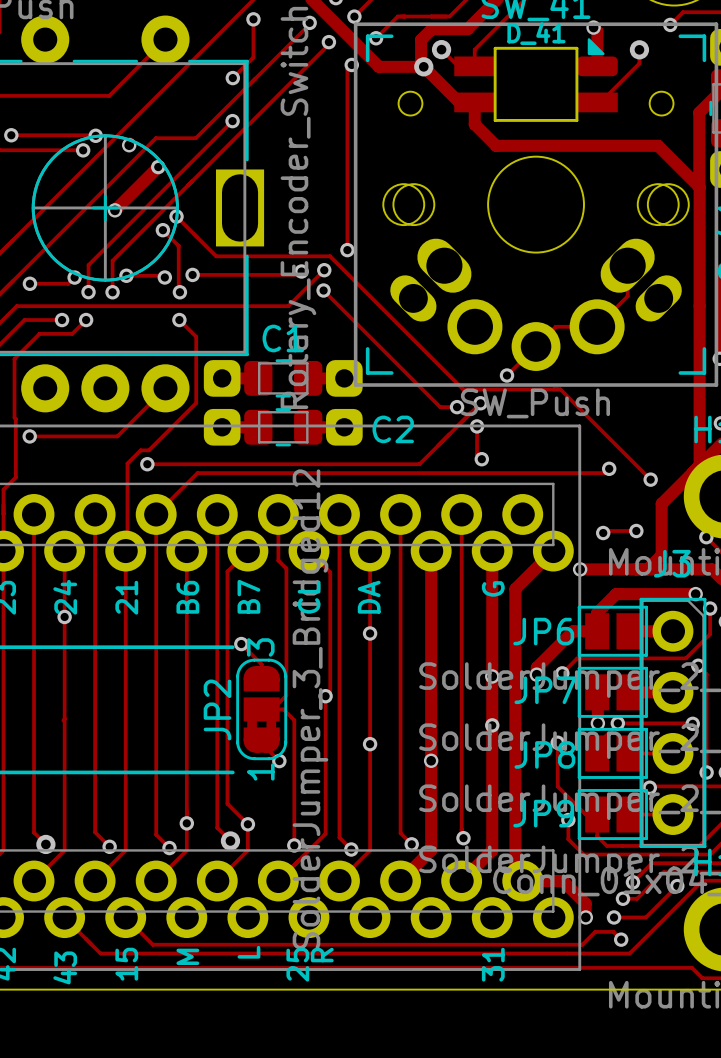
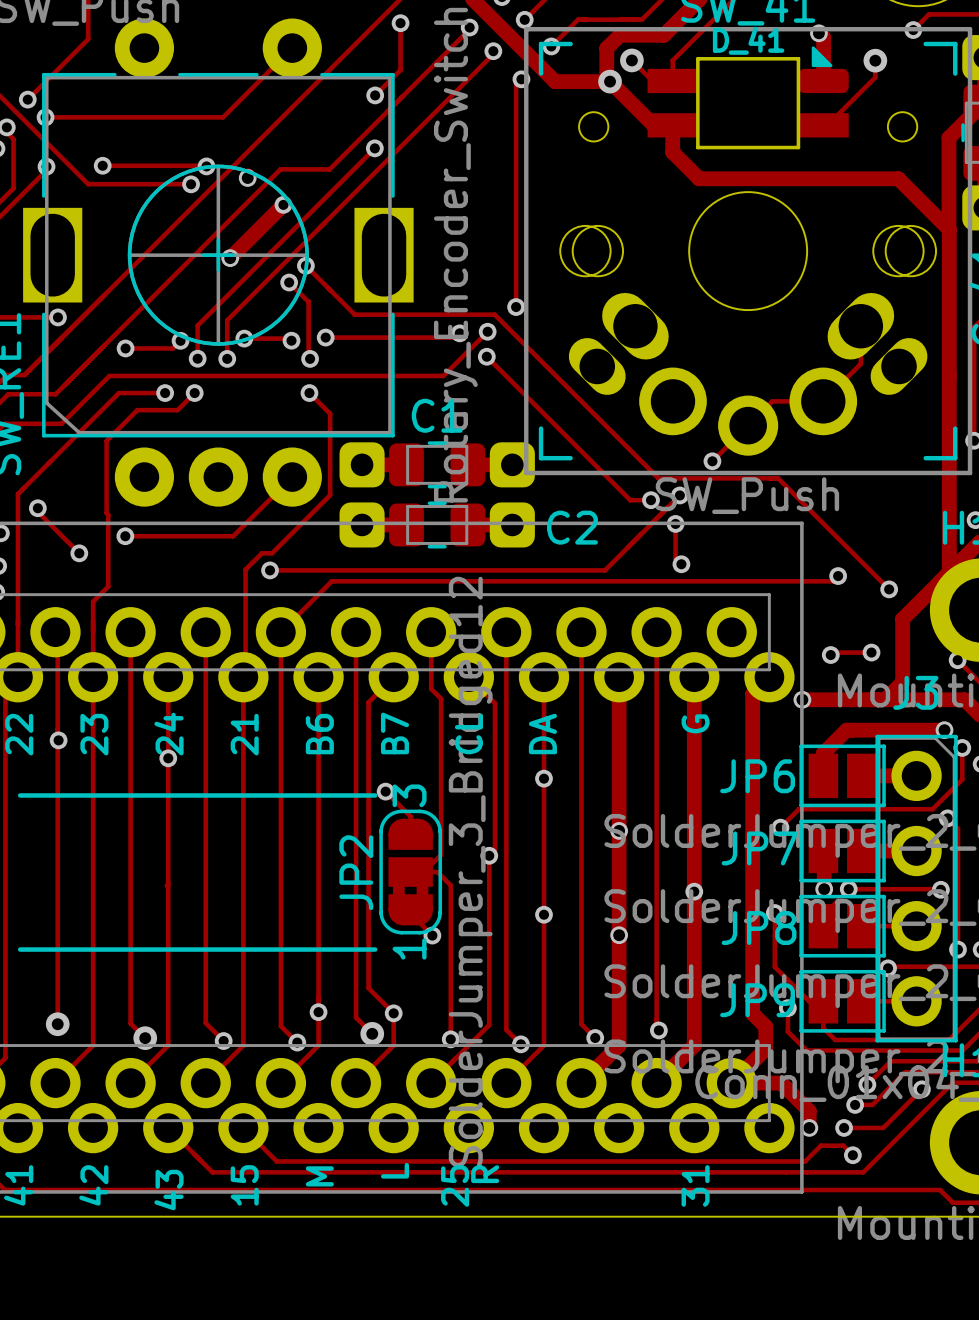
track: (539, 564) (515, 588) (515, 873) (522, 881) -> (752, 694) (752, 1013) (765, 1026) (765, 1049) (731, 1083)
track: (597, 631) (573, 631) (536, 667) (536, 674) -> none
via: (536, 674) -> none
via: none -> (619, 830)
via: (492, 676) -> none

